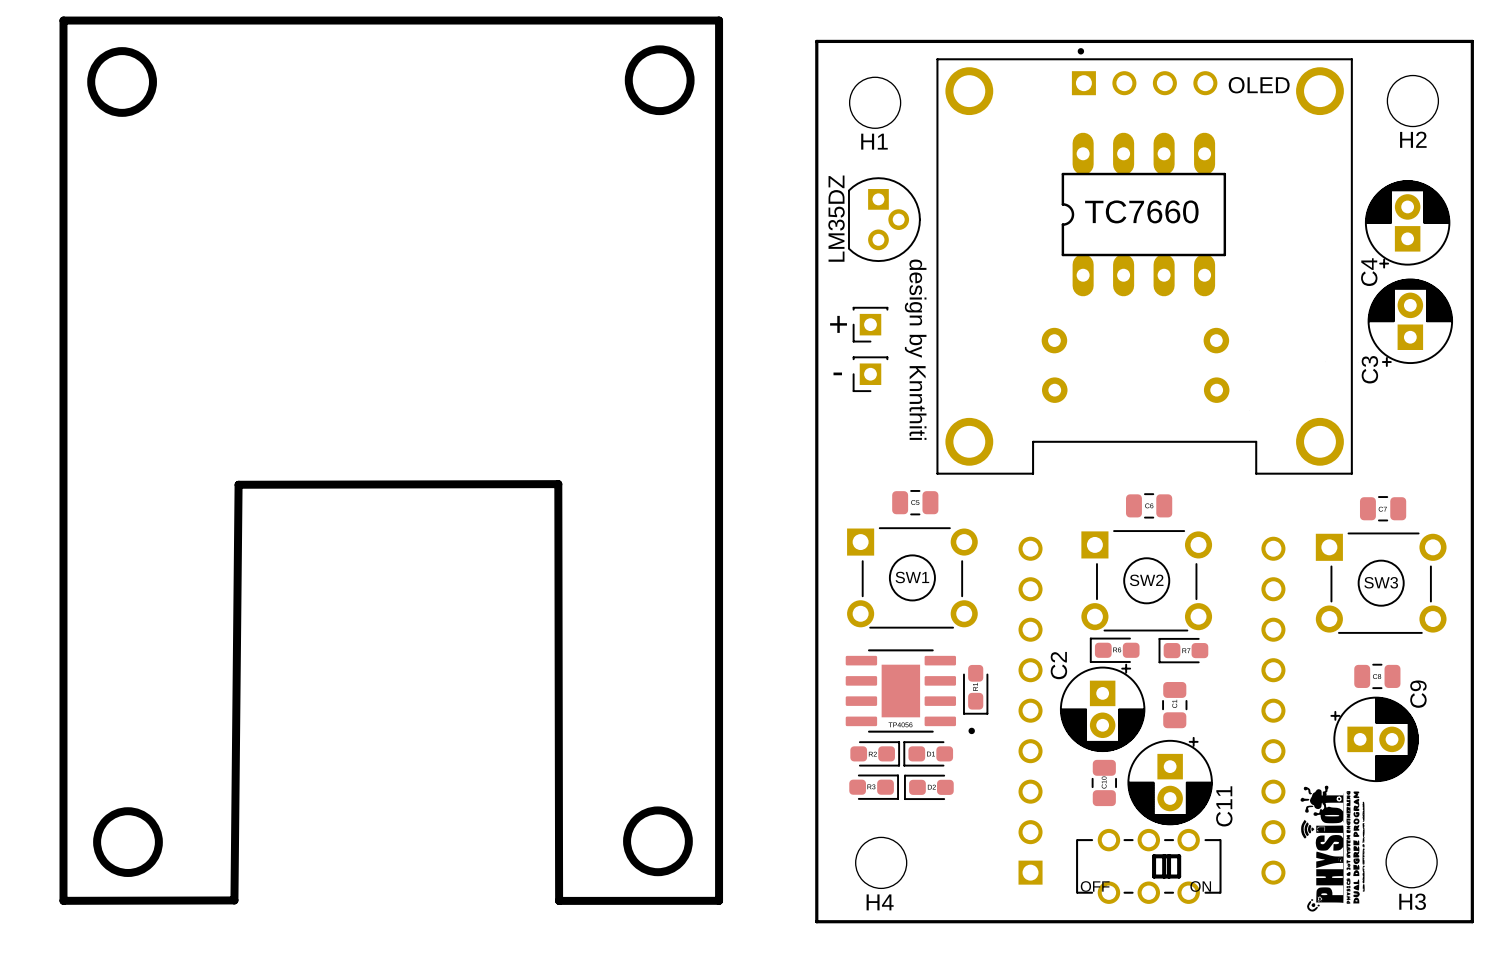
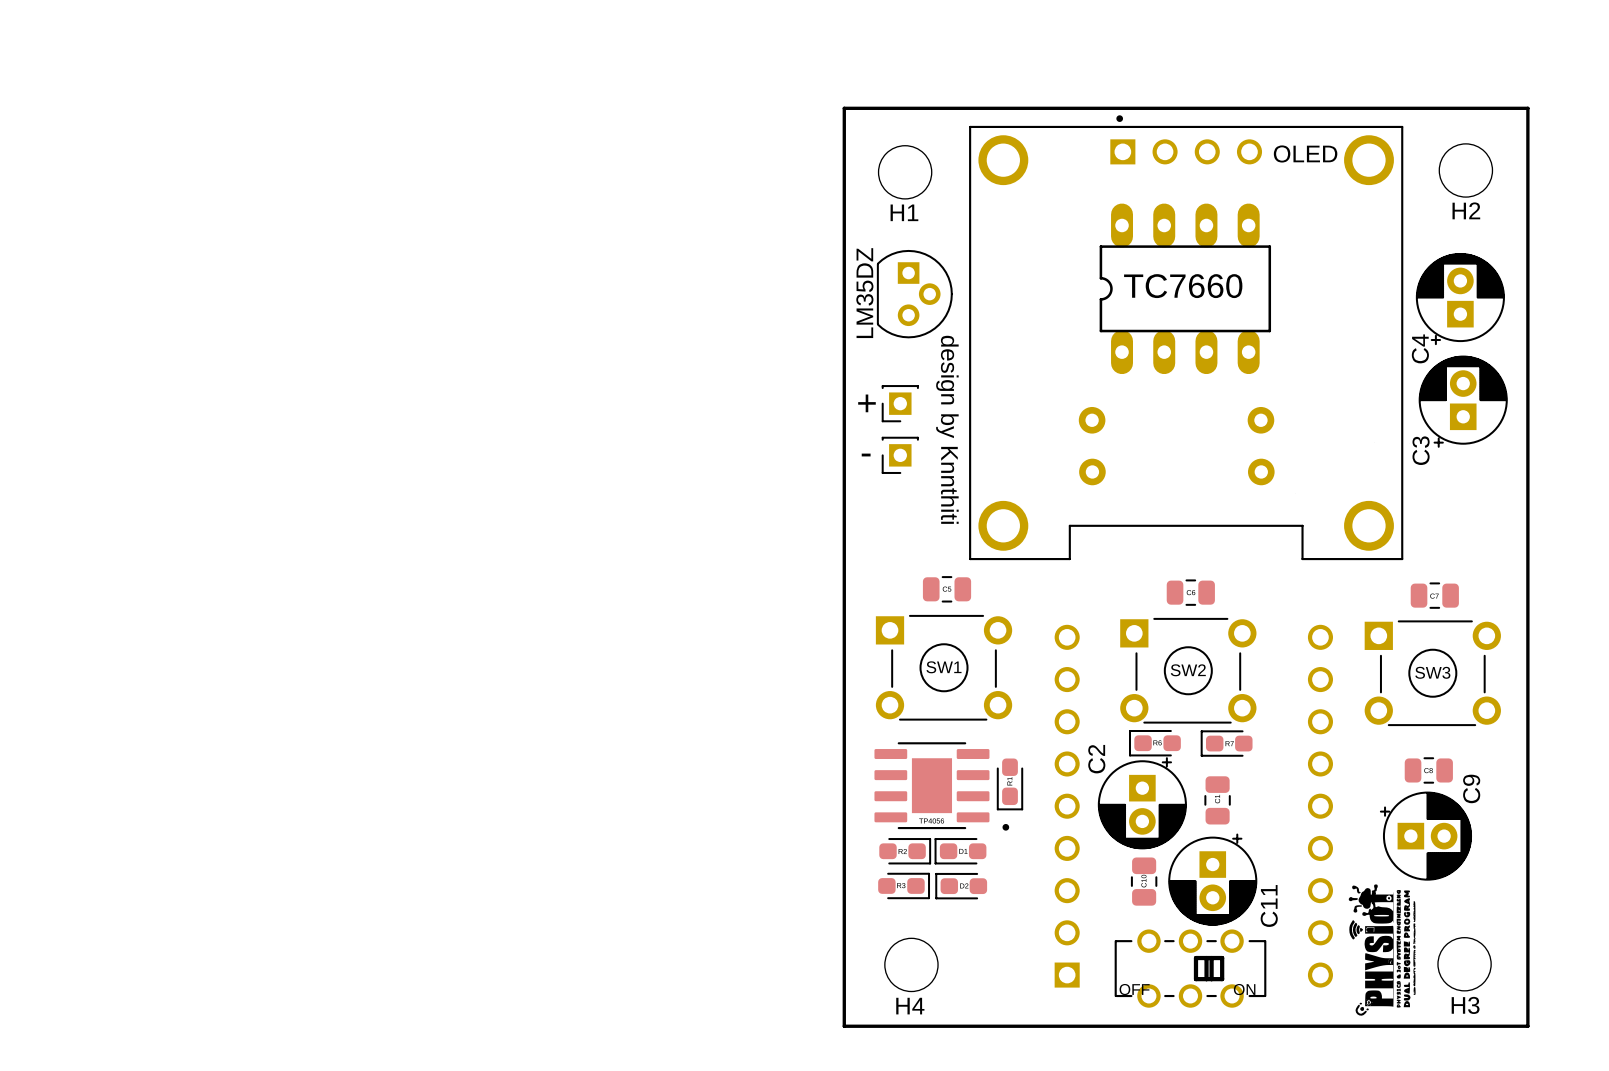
board edge: (63, 20) (63, 900) (234, 900) (238, 484) (558, 484) (559, 900) (719, 900) (719, 20) (63, 20) -> none
round board edge: [624, 45, 695, 116] -> none
round board edge: [87, 47, 157, 117] -> none
round board edge: [623, 806, 693, 877] -> none
round board edge: [93, 807, 163, 877] -> none

